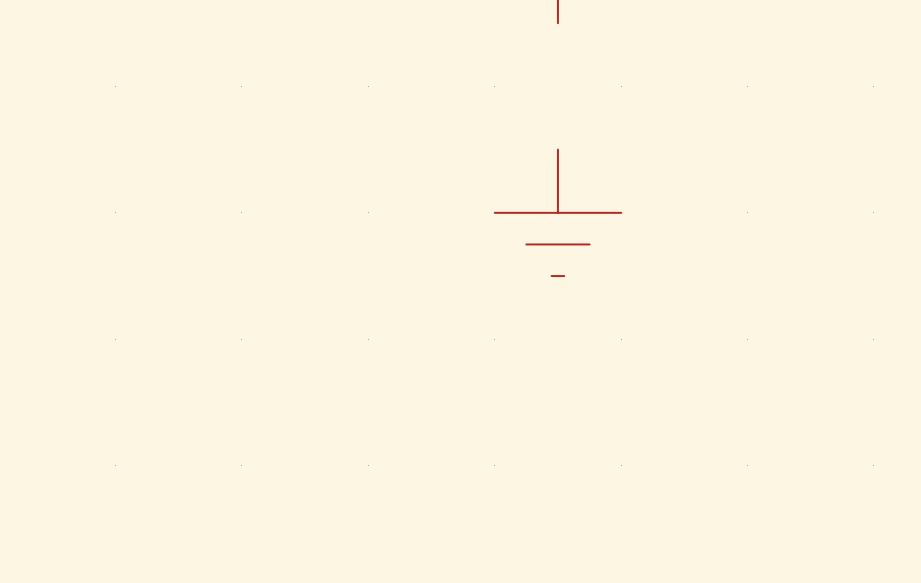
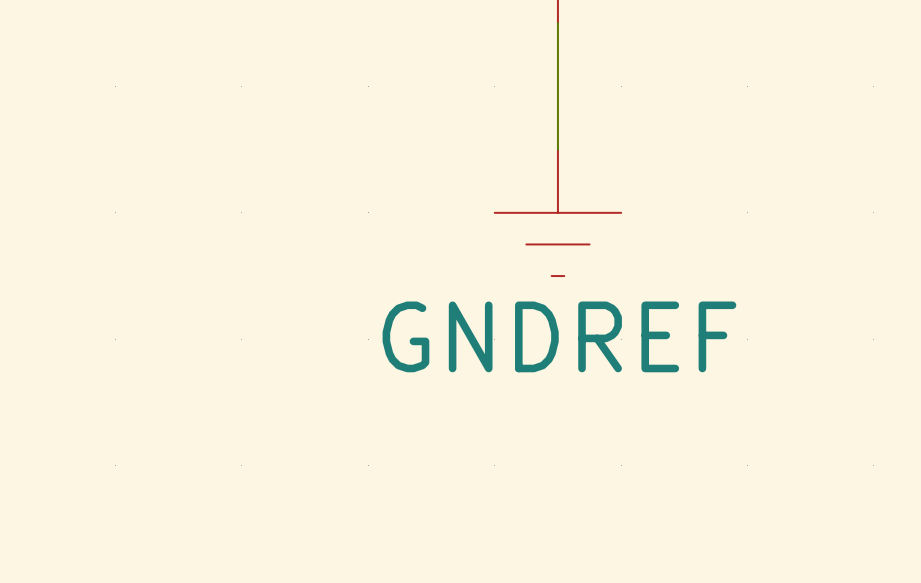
wire: none -> (557, 23) (557, 149)
power symbol text: none -> GNDREF (559, 336)

